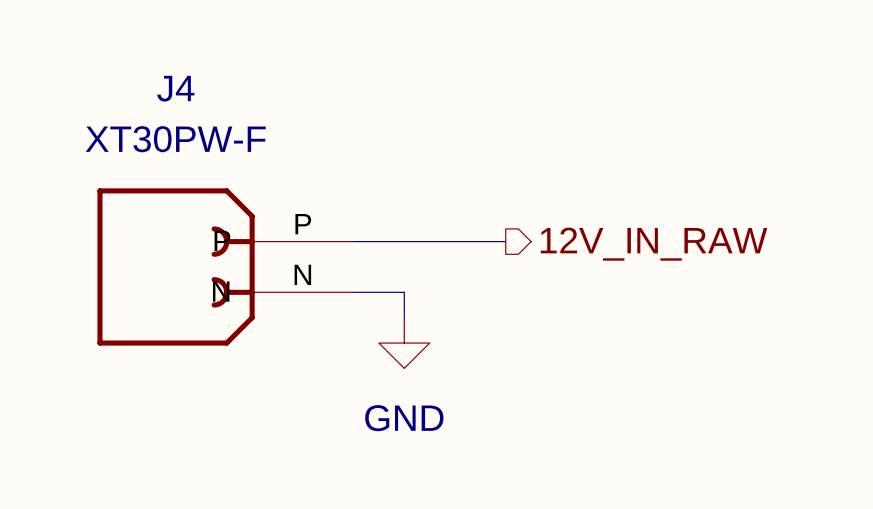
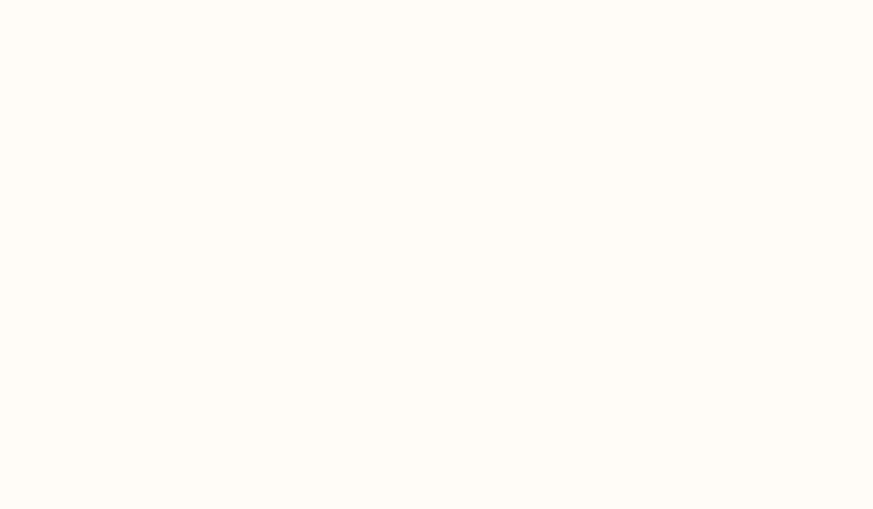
wire: (353, 241) (505, 241) -> none
hierarchical label: 12V_IN_RAW (654, 244) -> none
J4: XT30PW-F (225, 266) -> none
wire: (353, 292) (404, 292) (404, 317) -> none
power symbol: GND (404, 343) -> none

